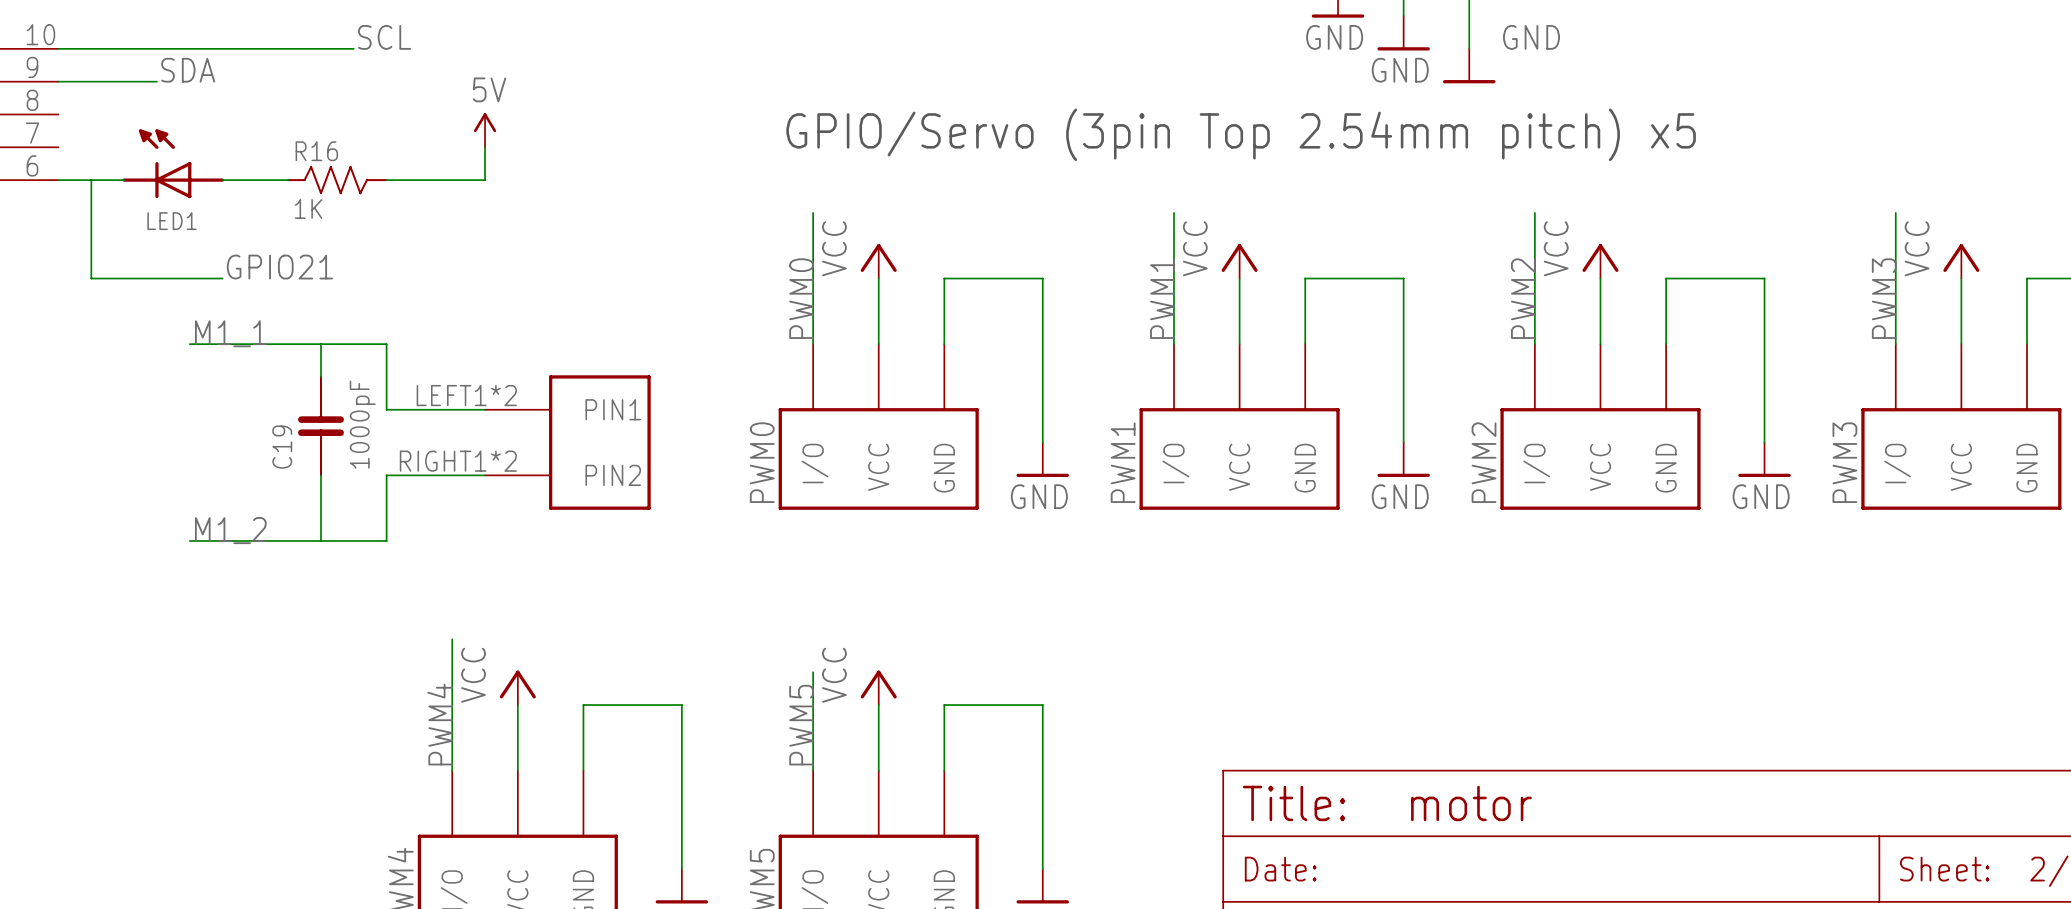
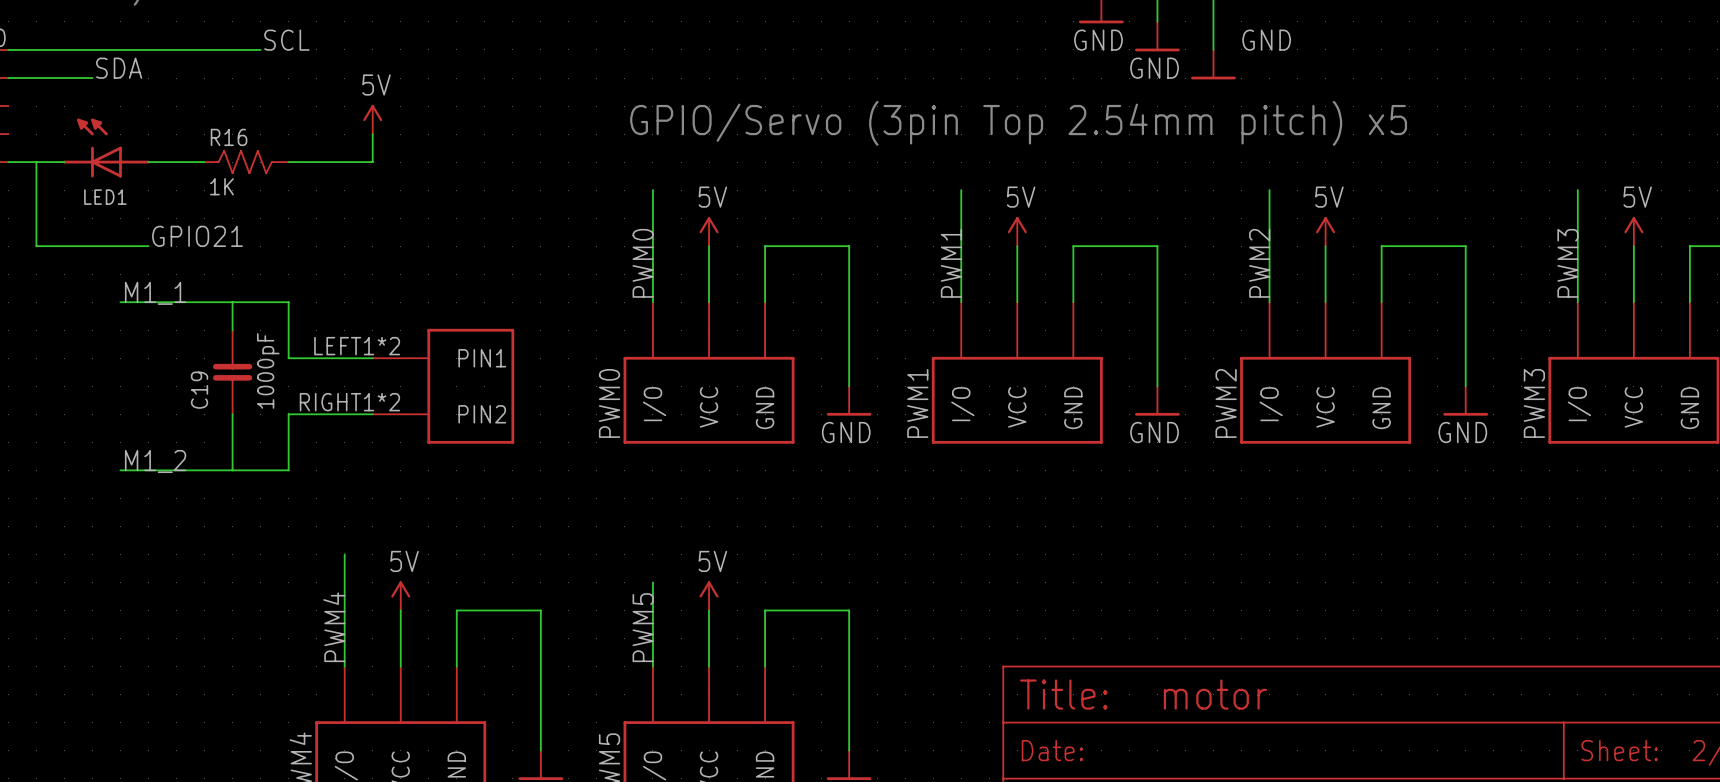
power symbol: VCC (878, 261) -> 5V (709, 231)
power symbol: VCC (1239, 261) -> 5V (1017, 231)
power symbol: VCC (1600, 261) -> 5V (1325, 231)
power symbol: VCC (1961, 261) -> 5V (1633, 231)
power symbol: VCC (517, 687) -> 5V (400, 595)
power symbol: VCC (878, 687) -> 5V (709, 595)

